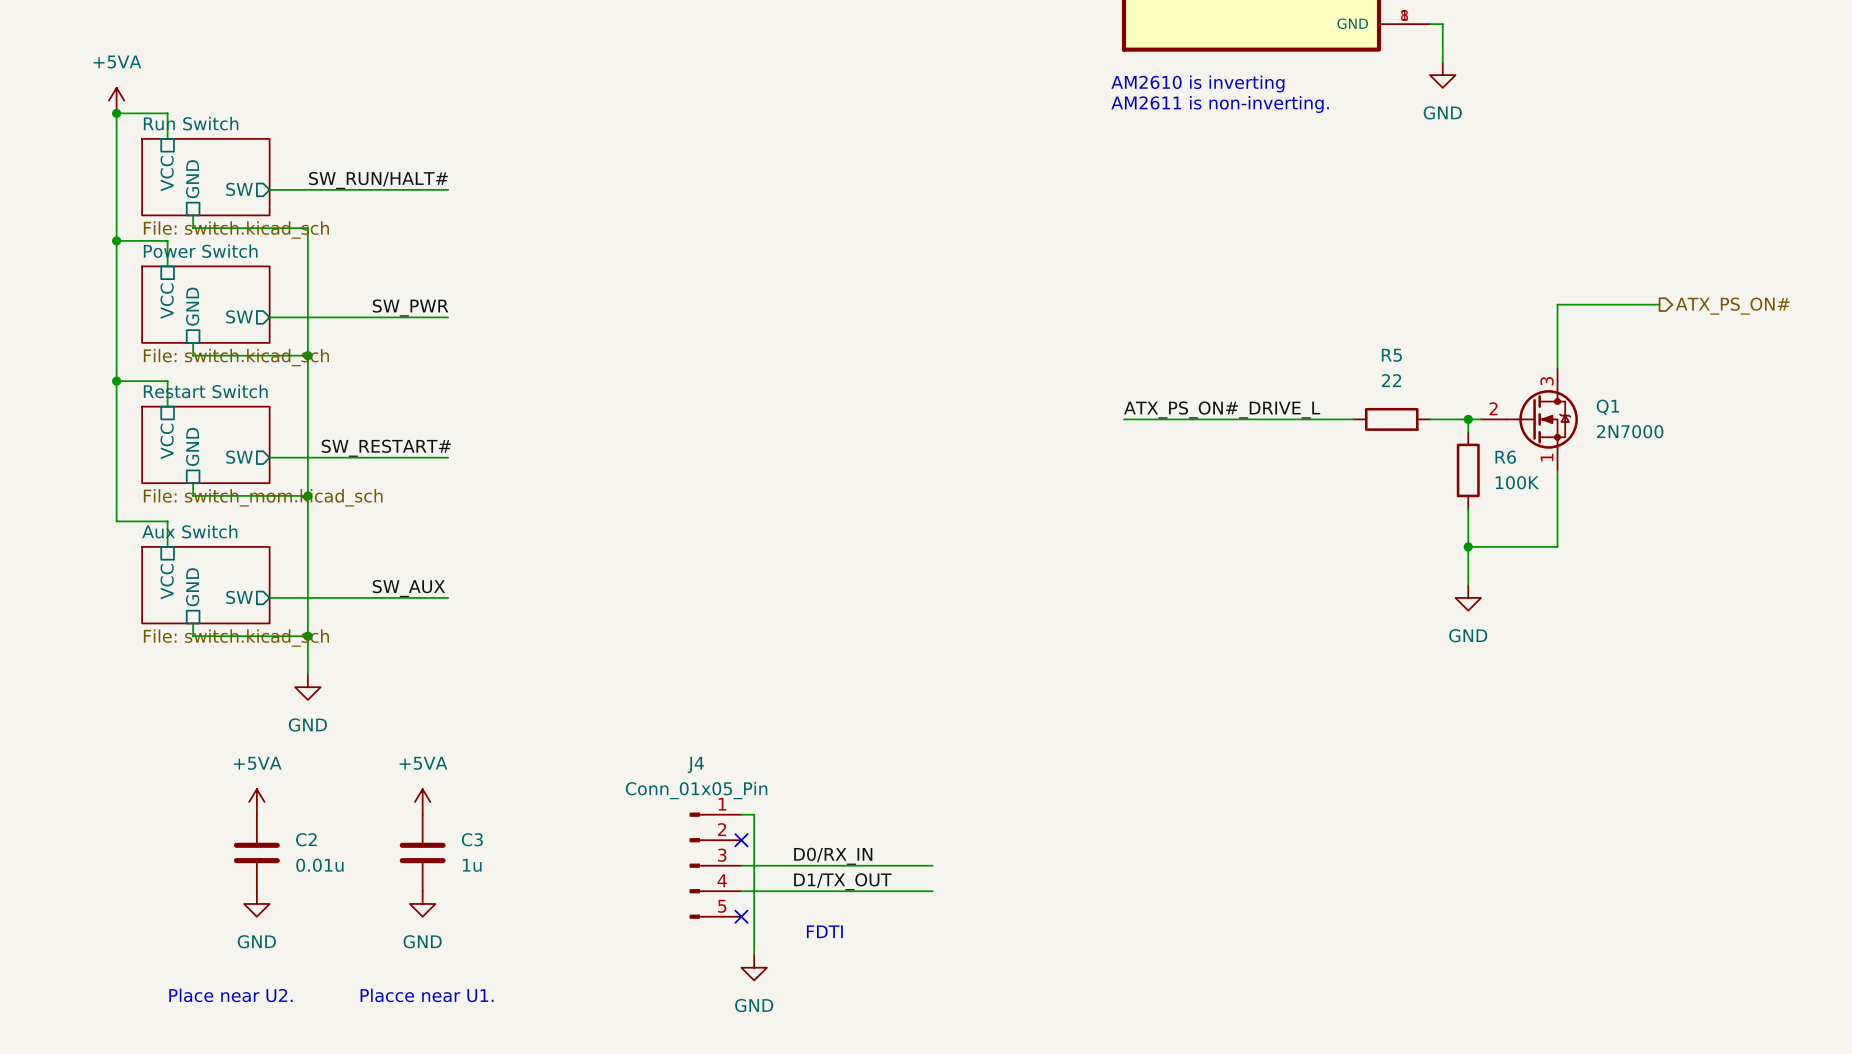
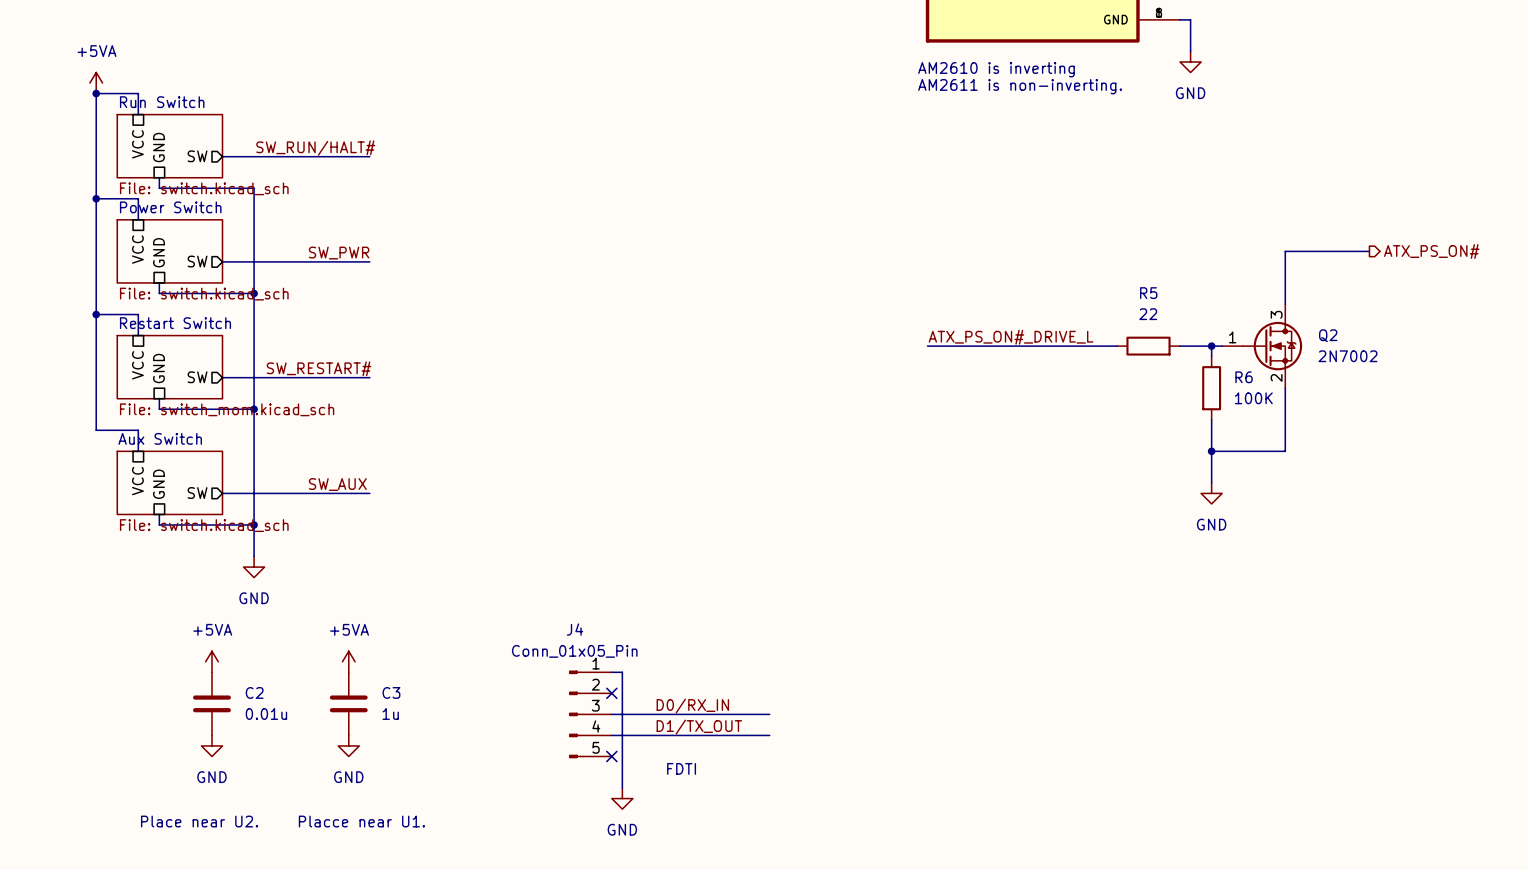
Q1 name: Q1 (1607, 407) -> Q2 (1328, 335)
Q1 pin number: 2 (1493, 408) -> 1 (1232, 337)
Q1 value: 2N7000 (1630, 431) -> 2N7002 (1348, 356)
Q1 pin number: 1 (1547, 457) -> 2 (1276, 377)

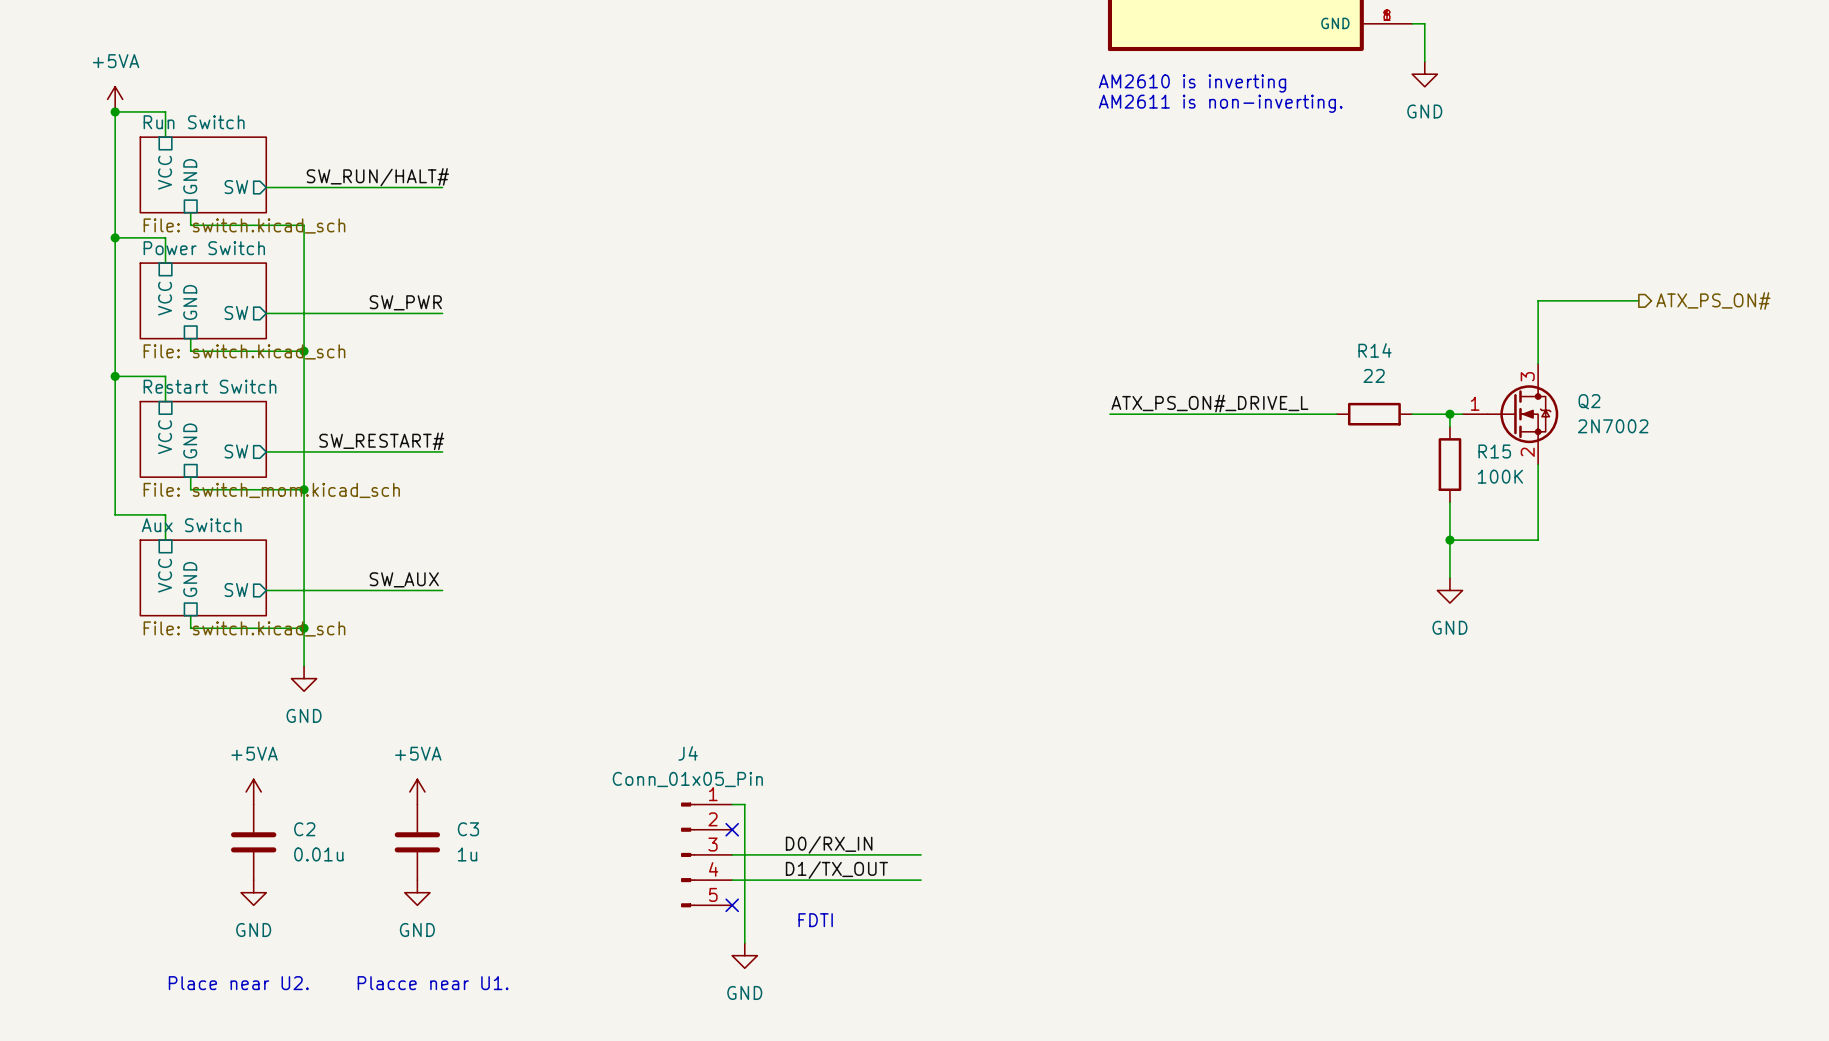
R5 name: R5 (1148, 293) -> R14 (1375, 350)
R6 name: R6 (1244, 377) -> R15 (1494, 451)

